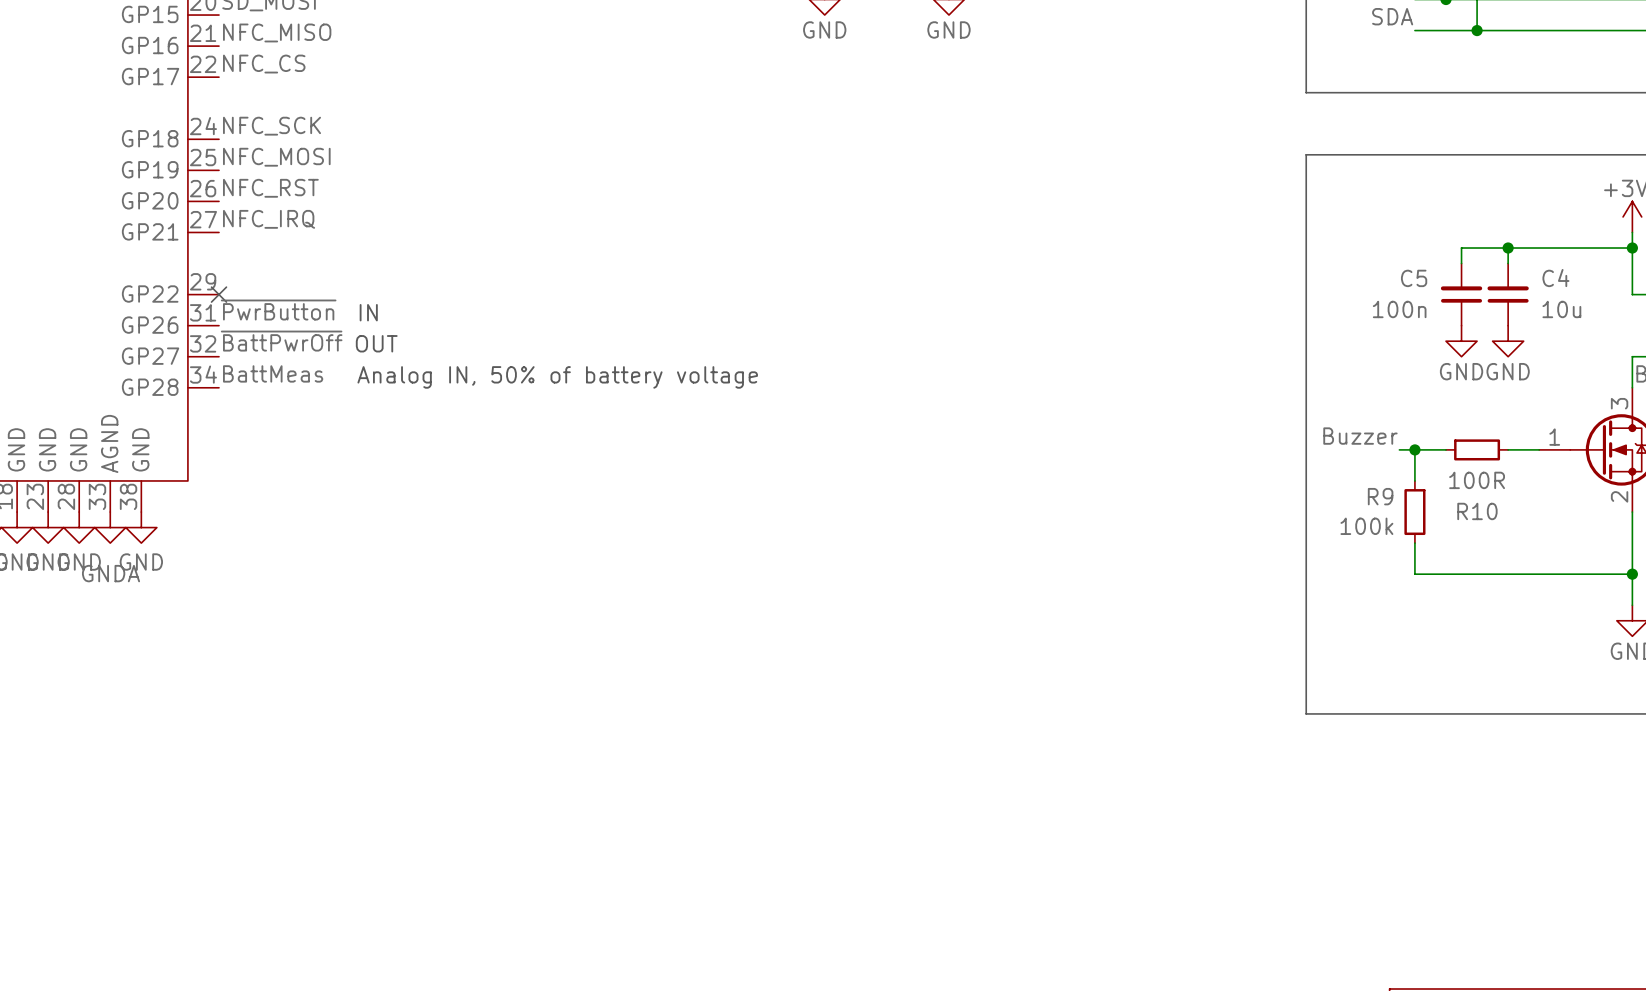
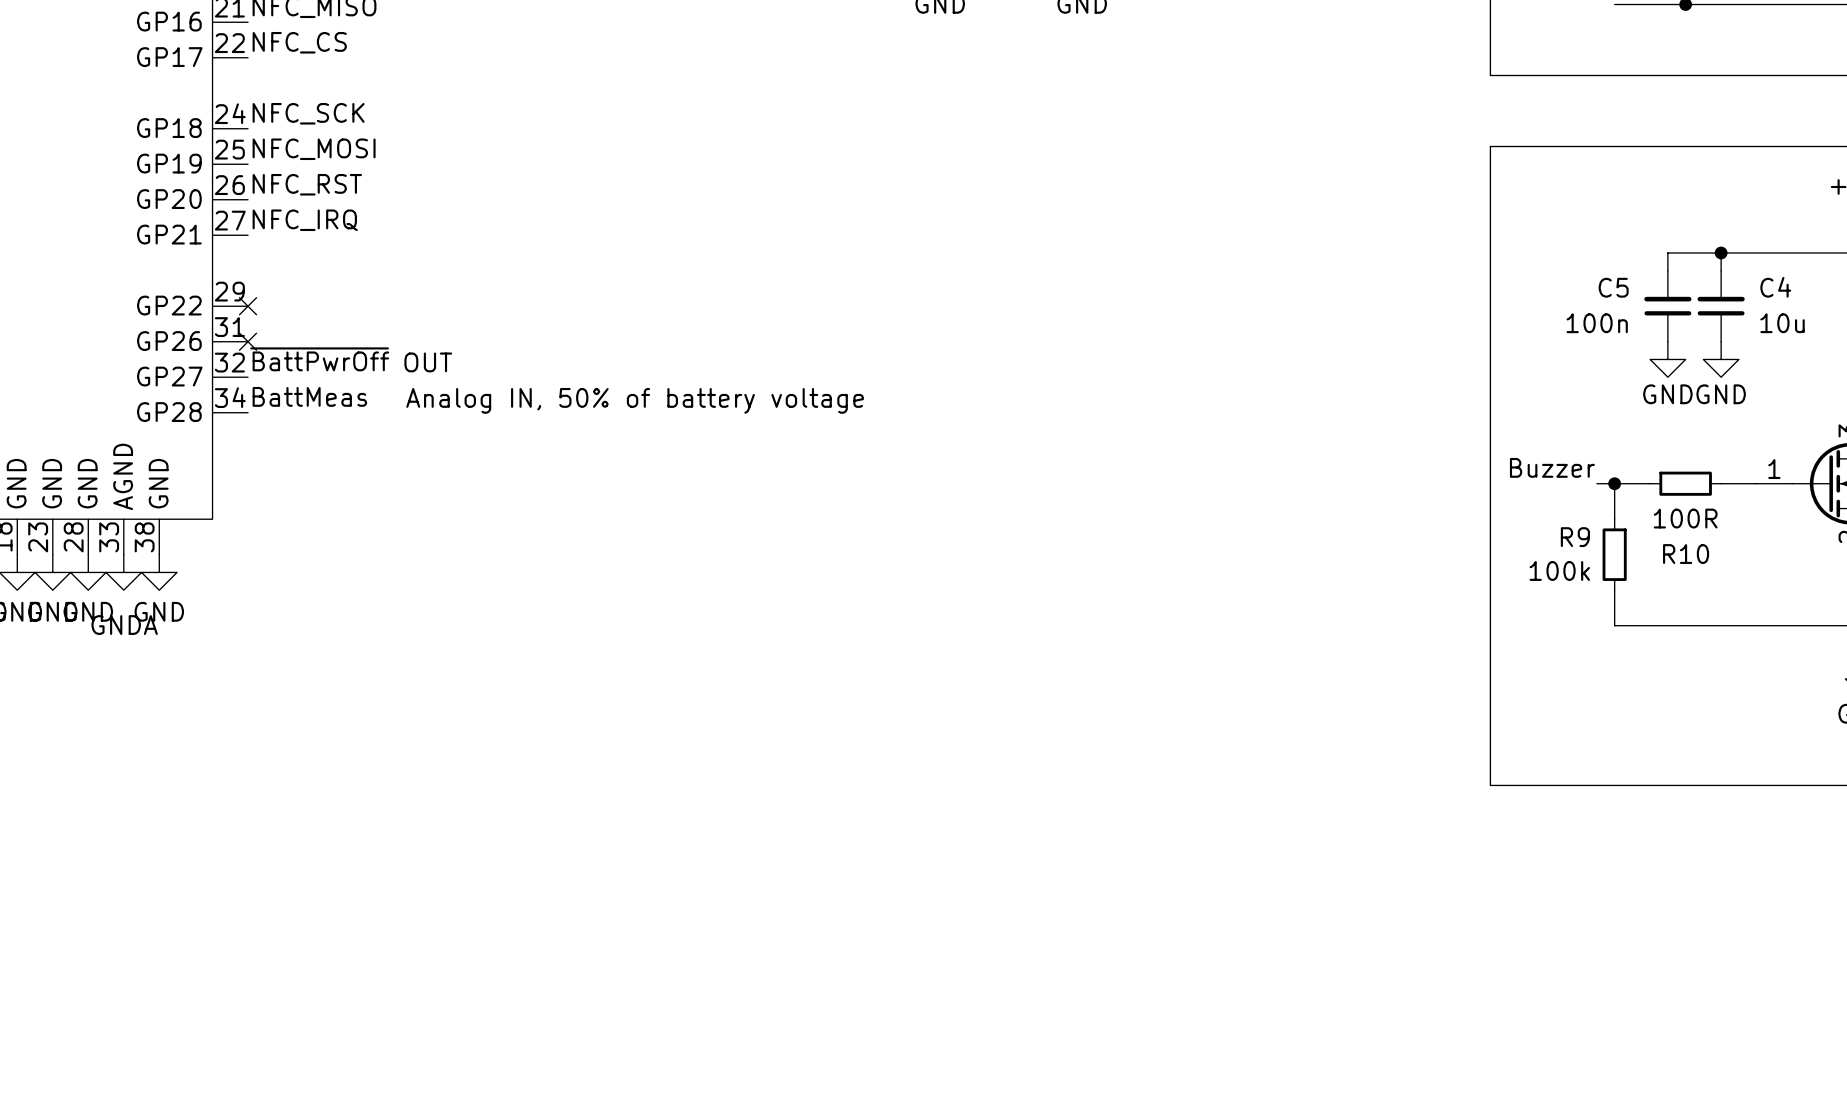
label: ~{PwrButton} (278, 310) -> none
text: IN (368, 312) -> none
no-connect mark: none -> (248, 341)

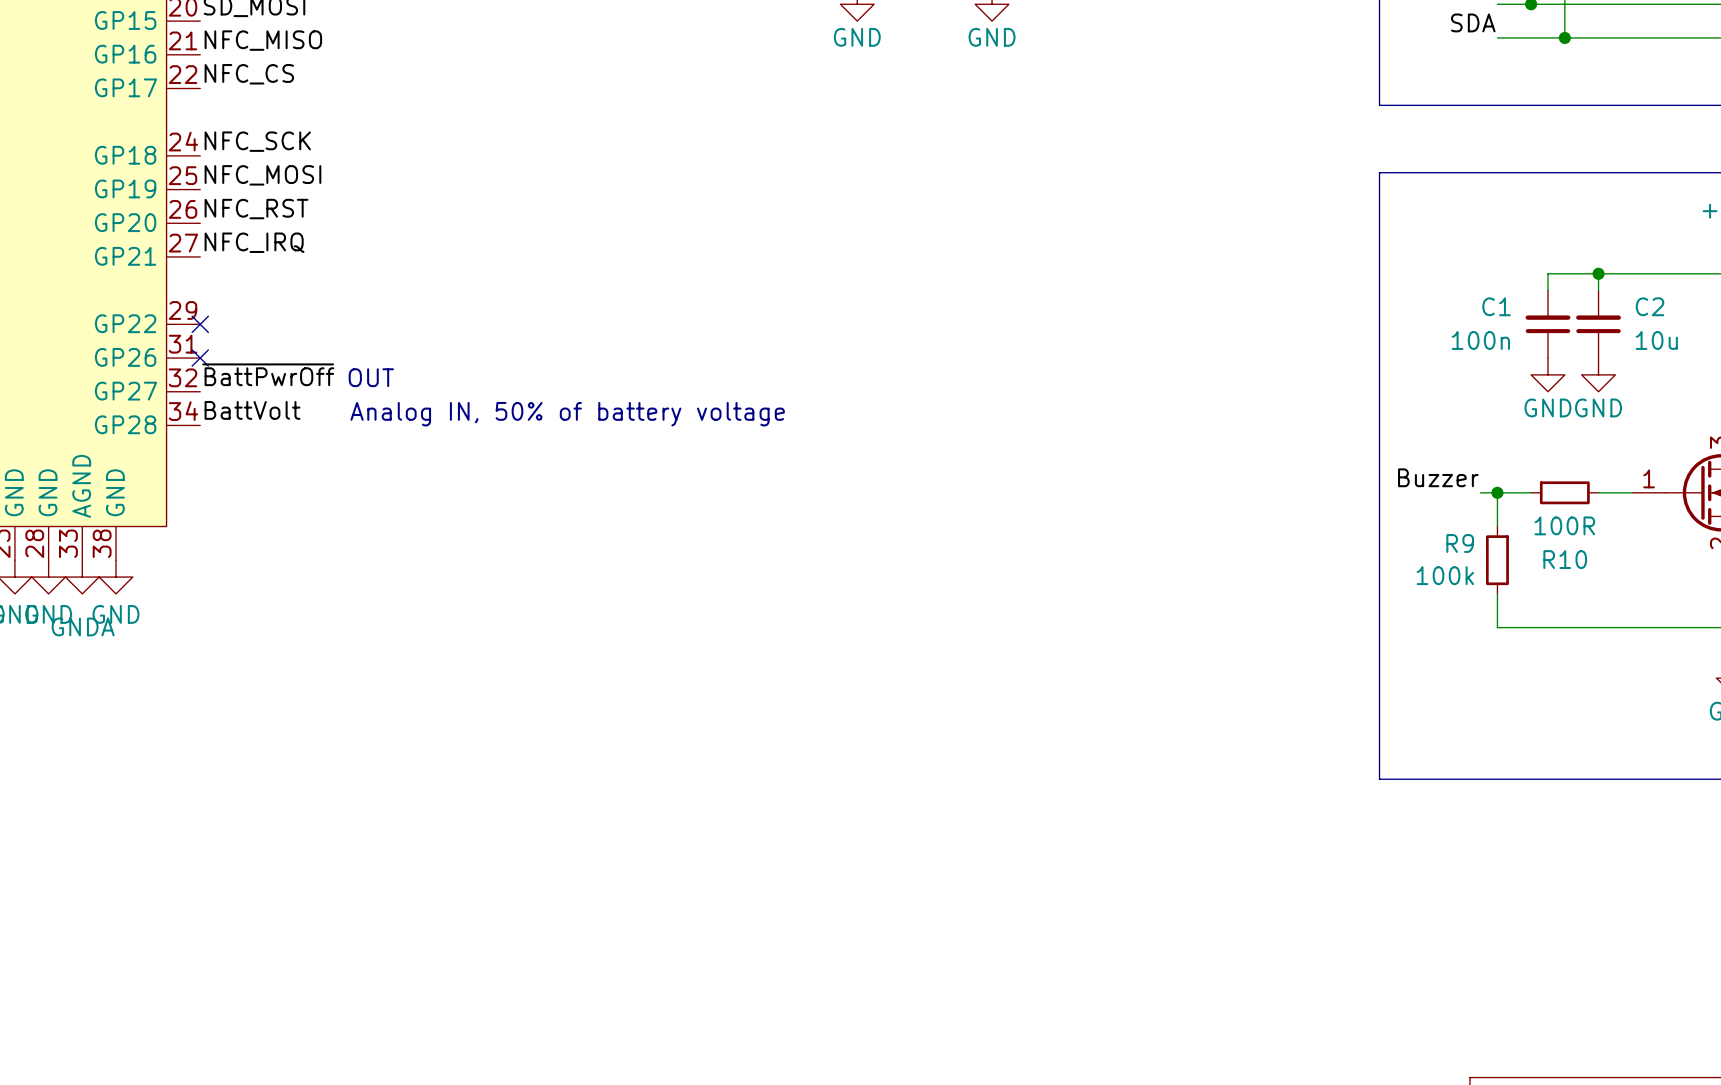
C5 name: C5 (1613, 287) -> C1 (1496, 306)
C4 name: C4 (1775, 287) -> C2 (1650, 306)
label: BattMeas (309, 396) -> BattVolt (252, 410)

